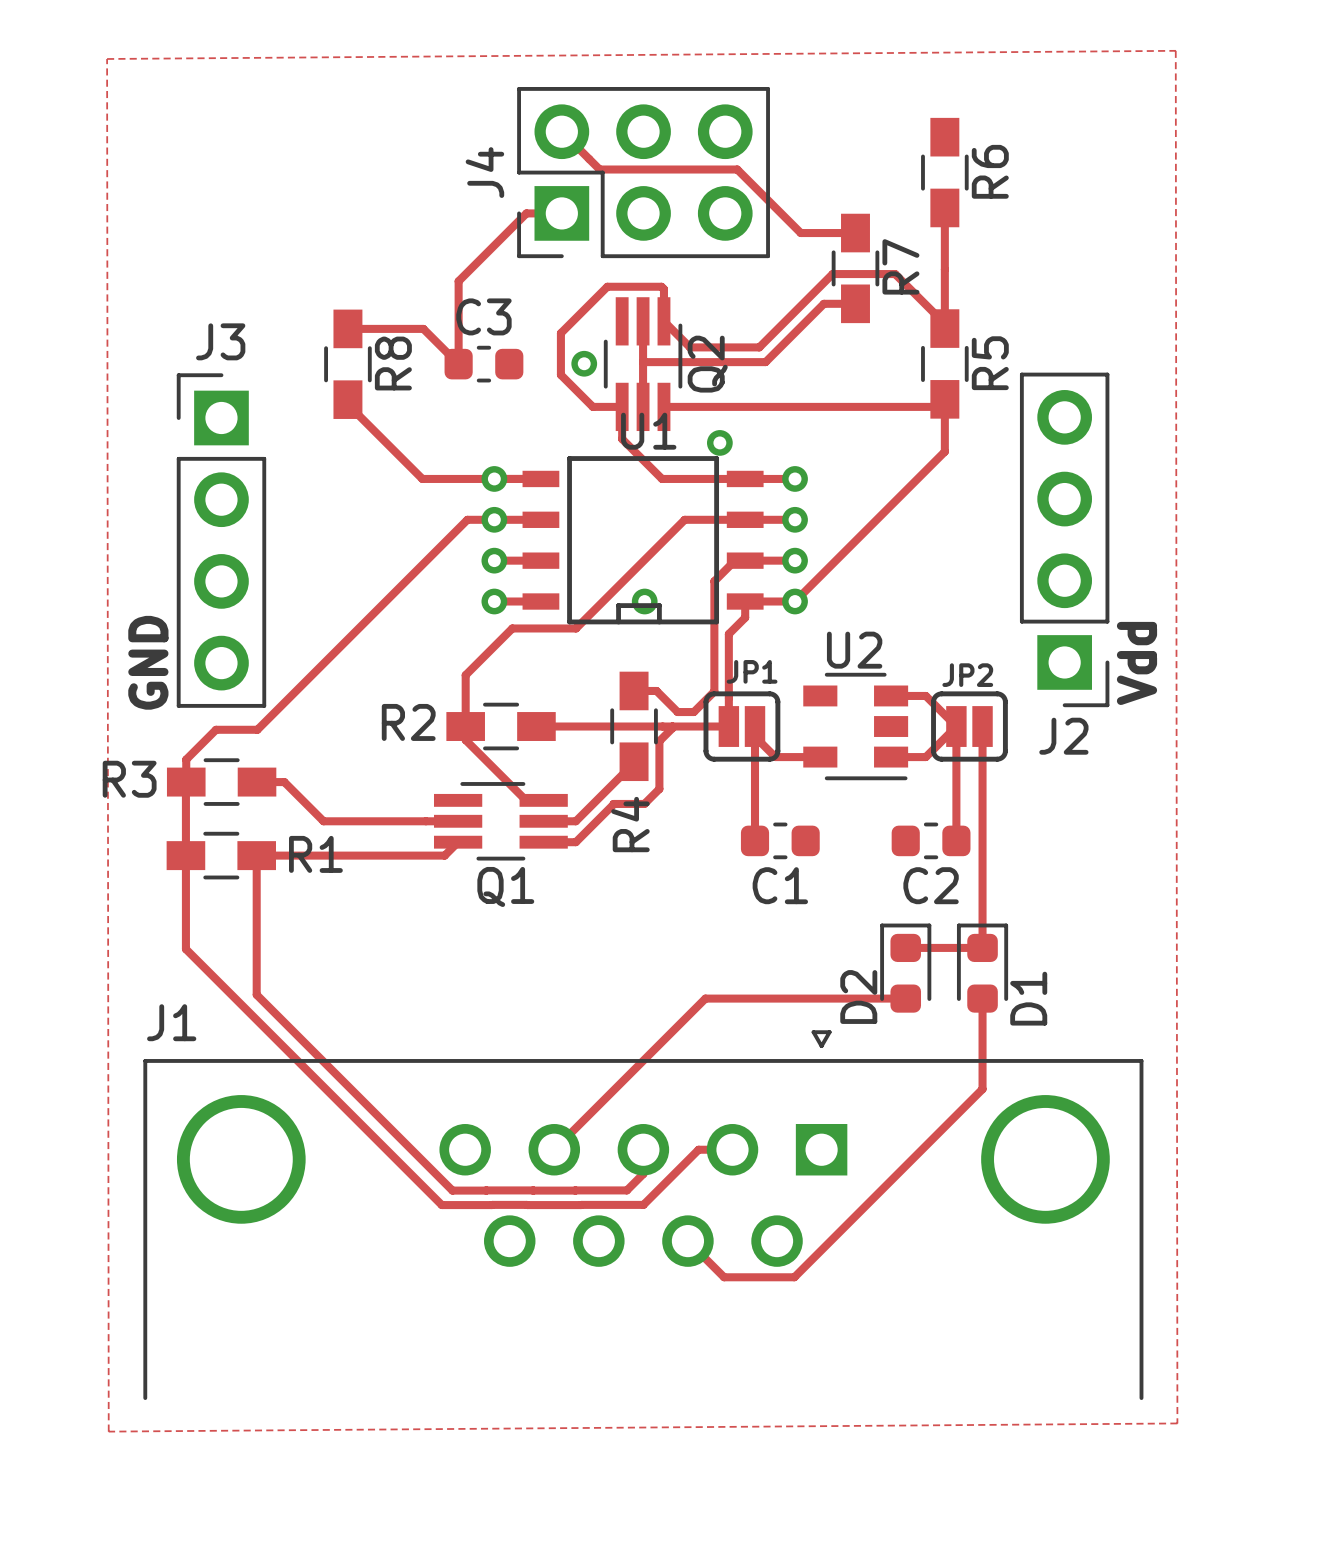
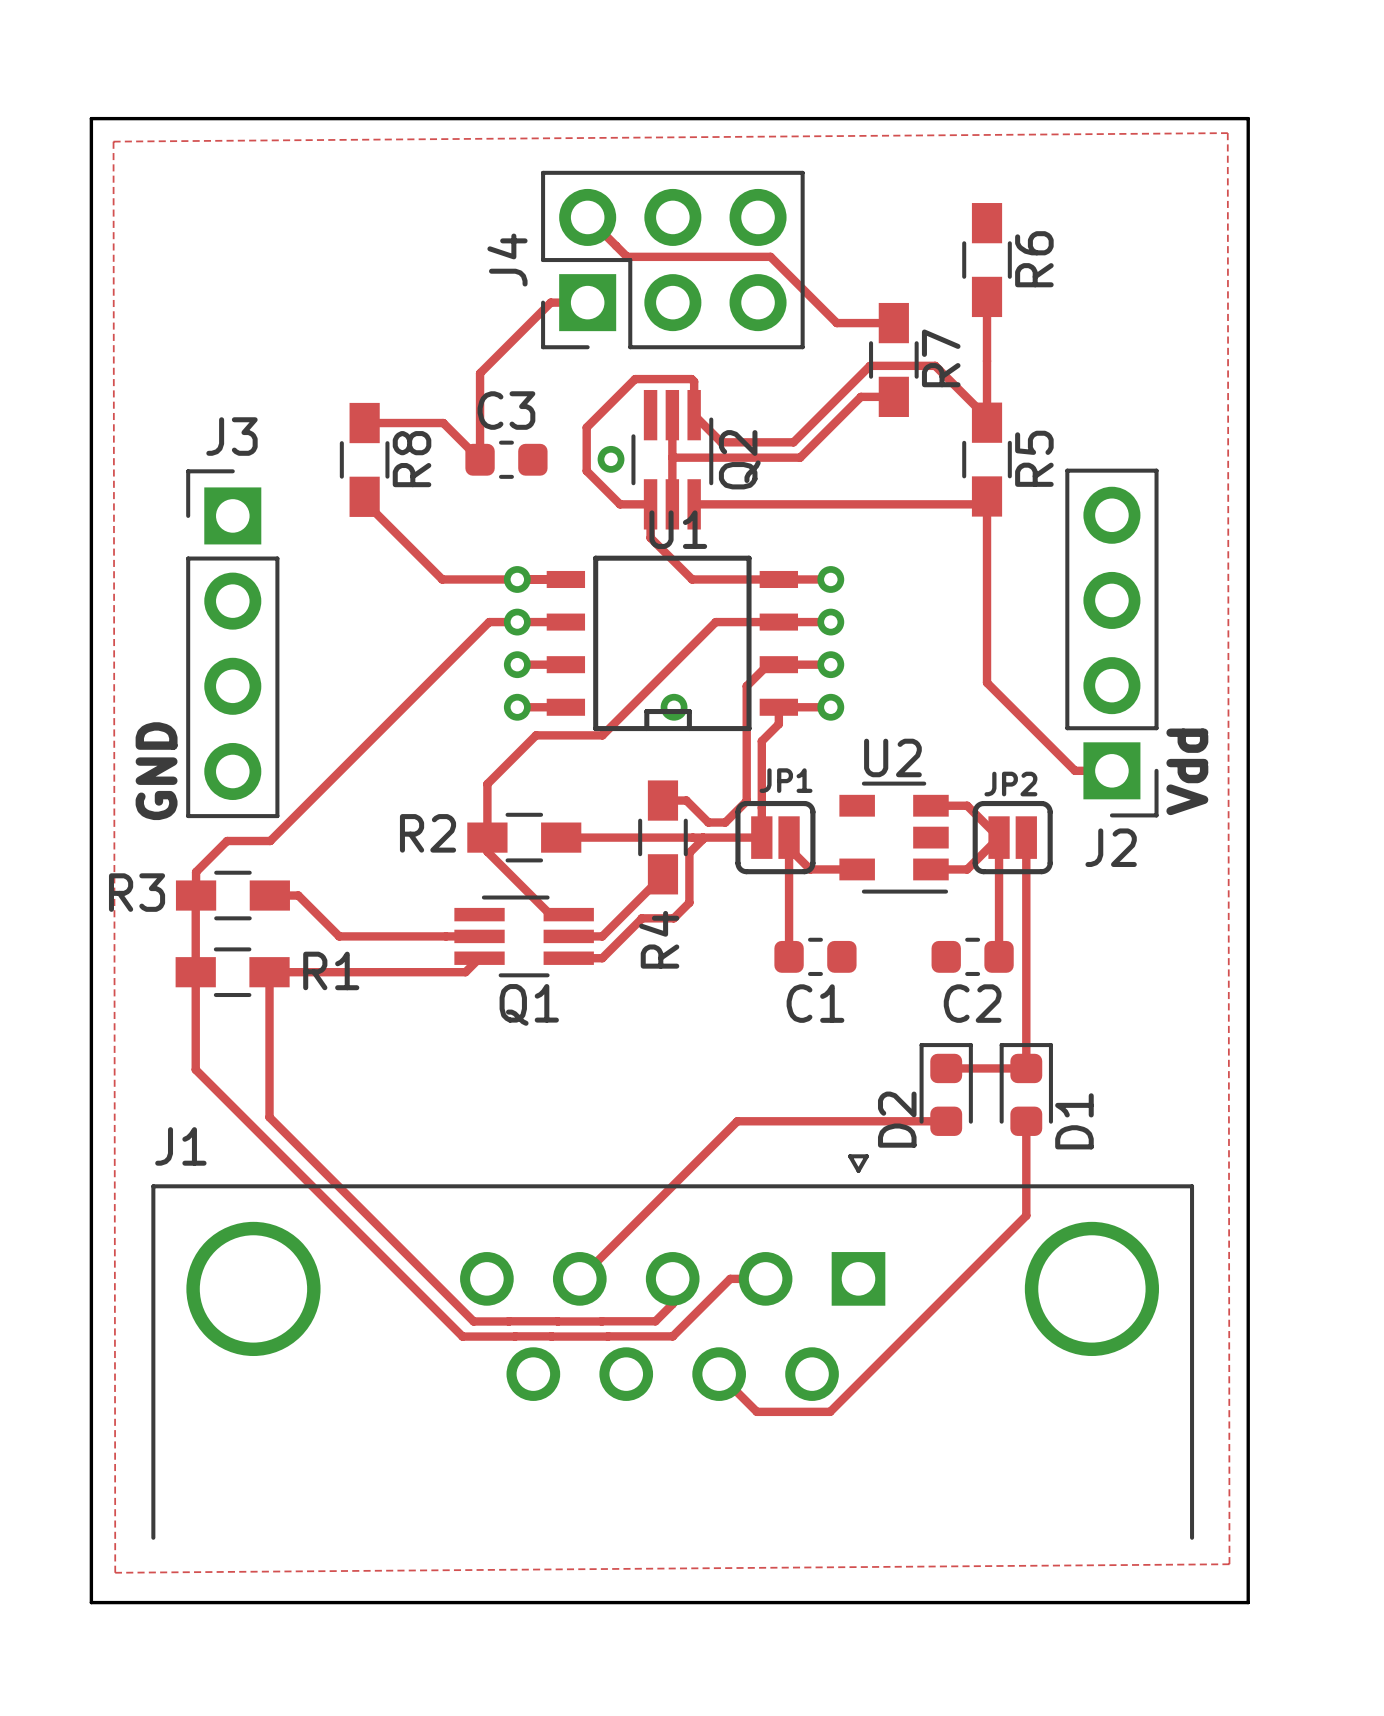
board edge: none -> (91, 118) (91, 1602) (1248, 1602) (1248, 118) (91, 118)
via: (719, 442) -> none
track: (944, 451) (795, 601) -> (987, 551) (987, 682) (1075, 770) (1111, 770)

